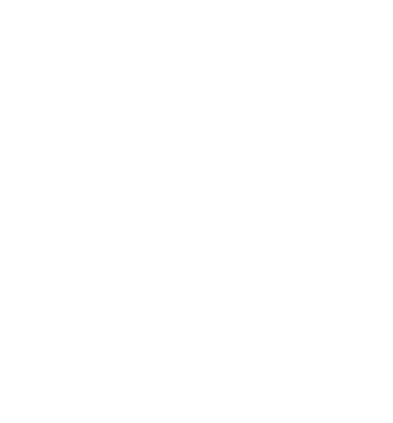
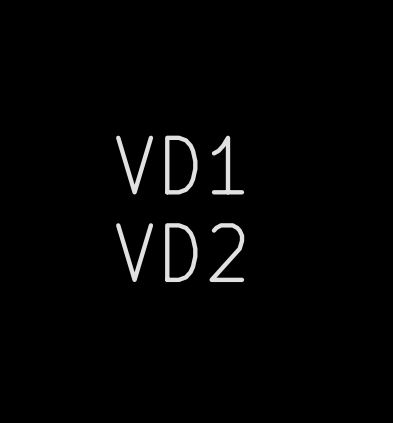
text: none -> VD1 (180, 165)
text: none -> VD2 (180, 252)

